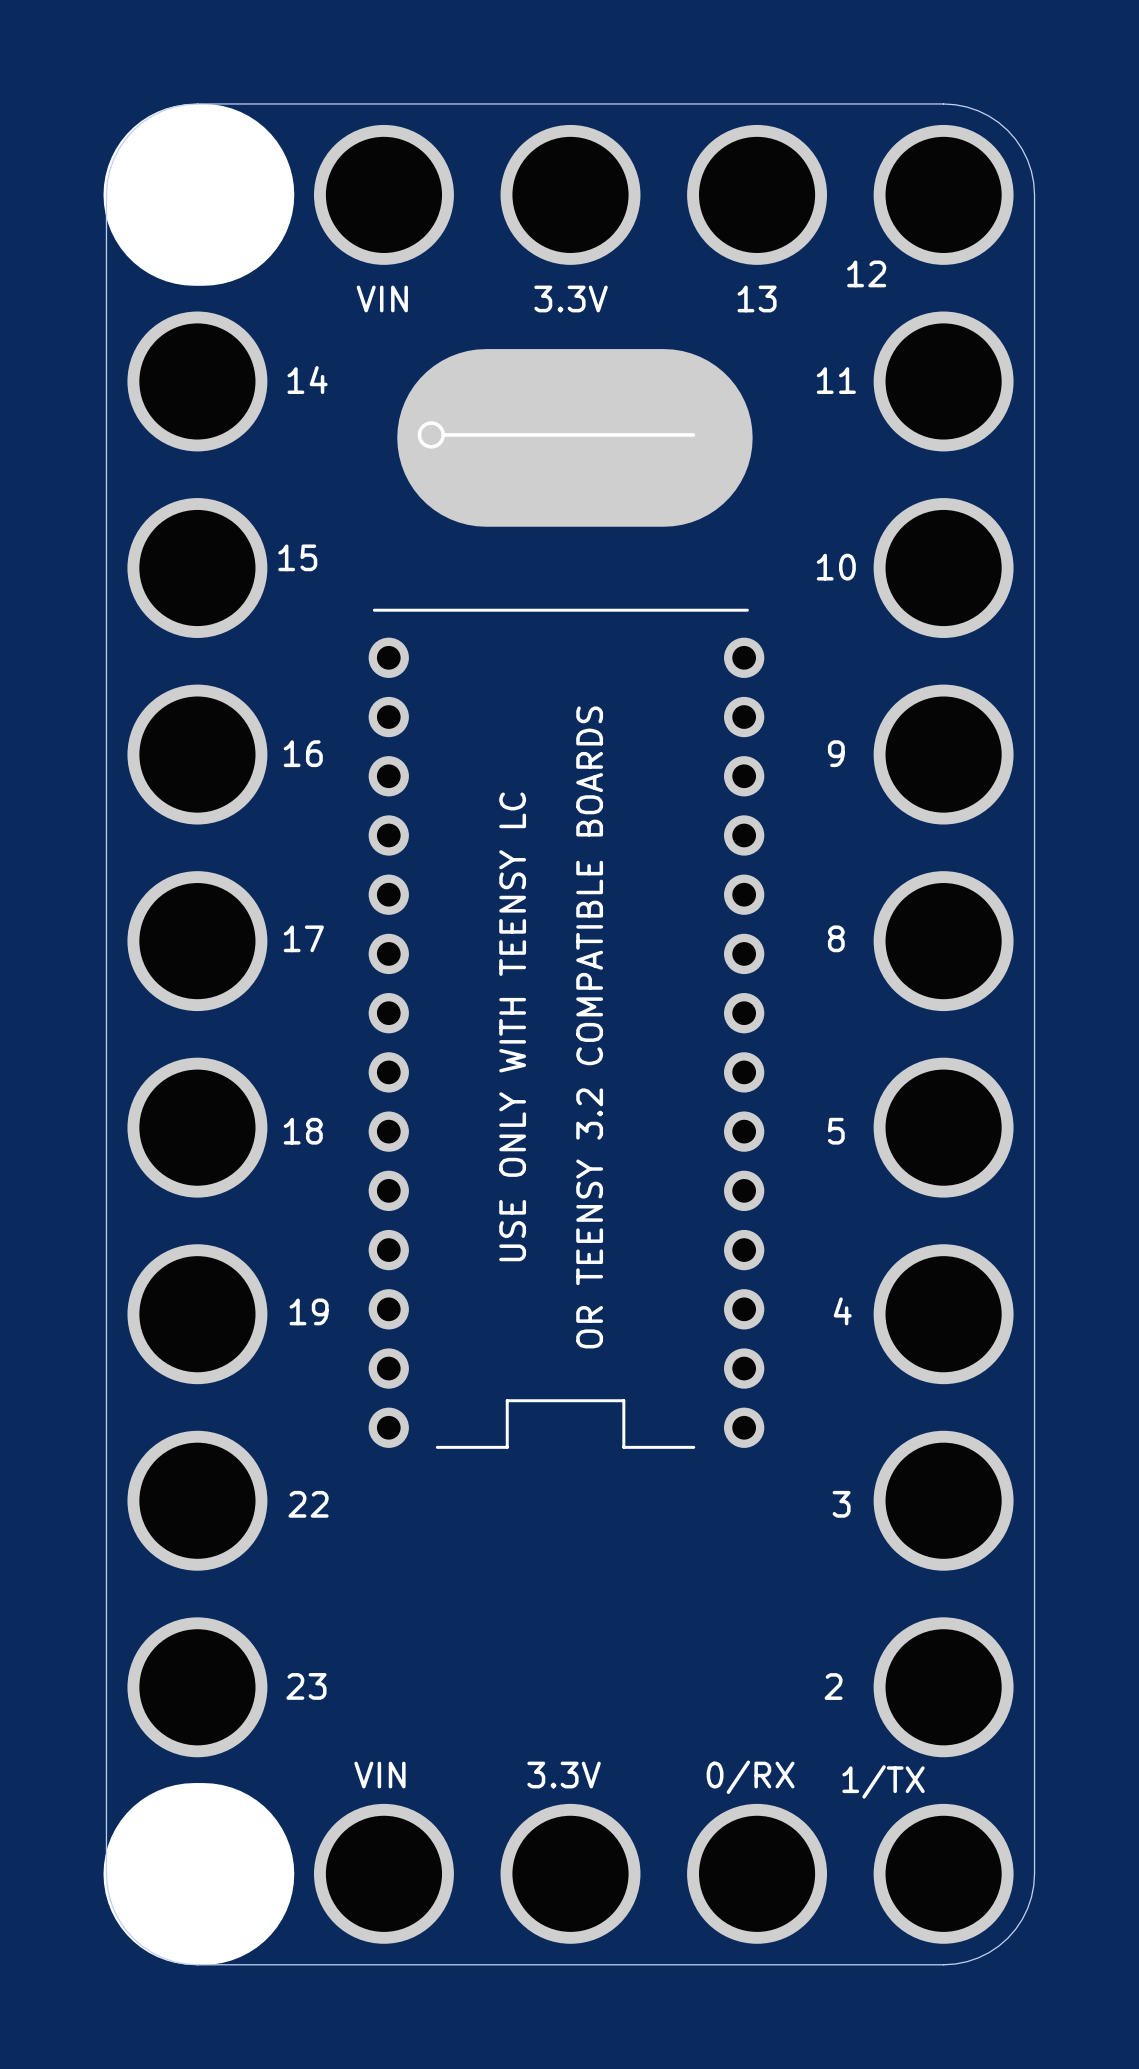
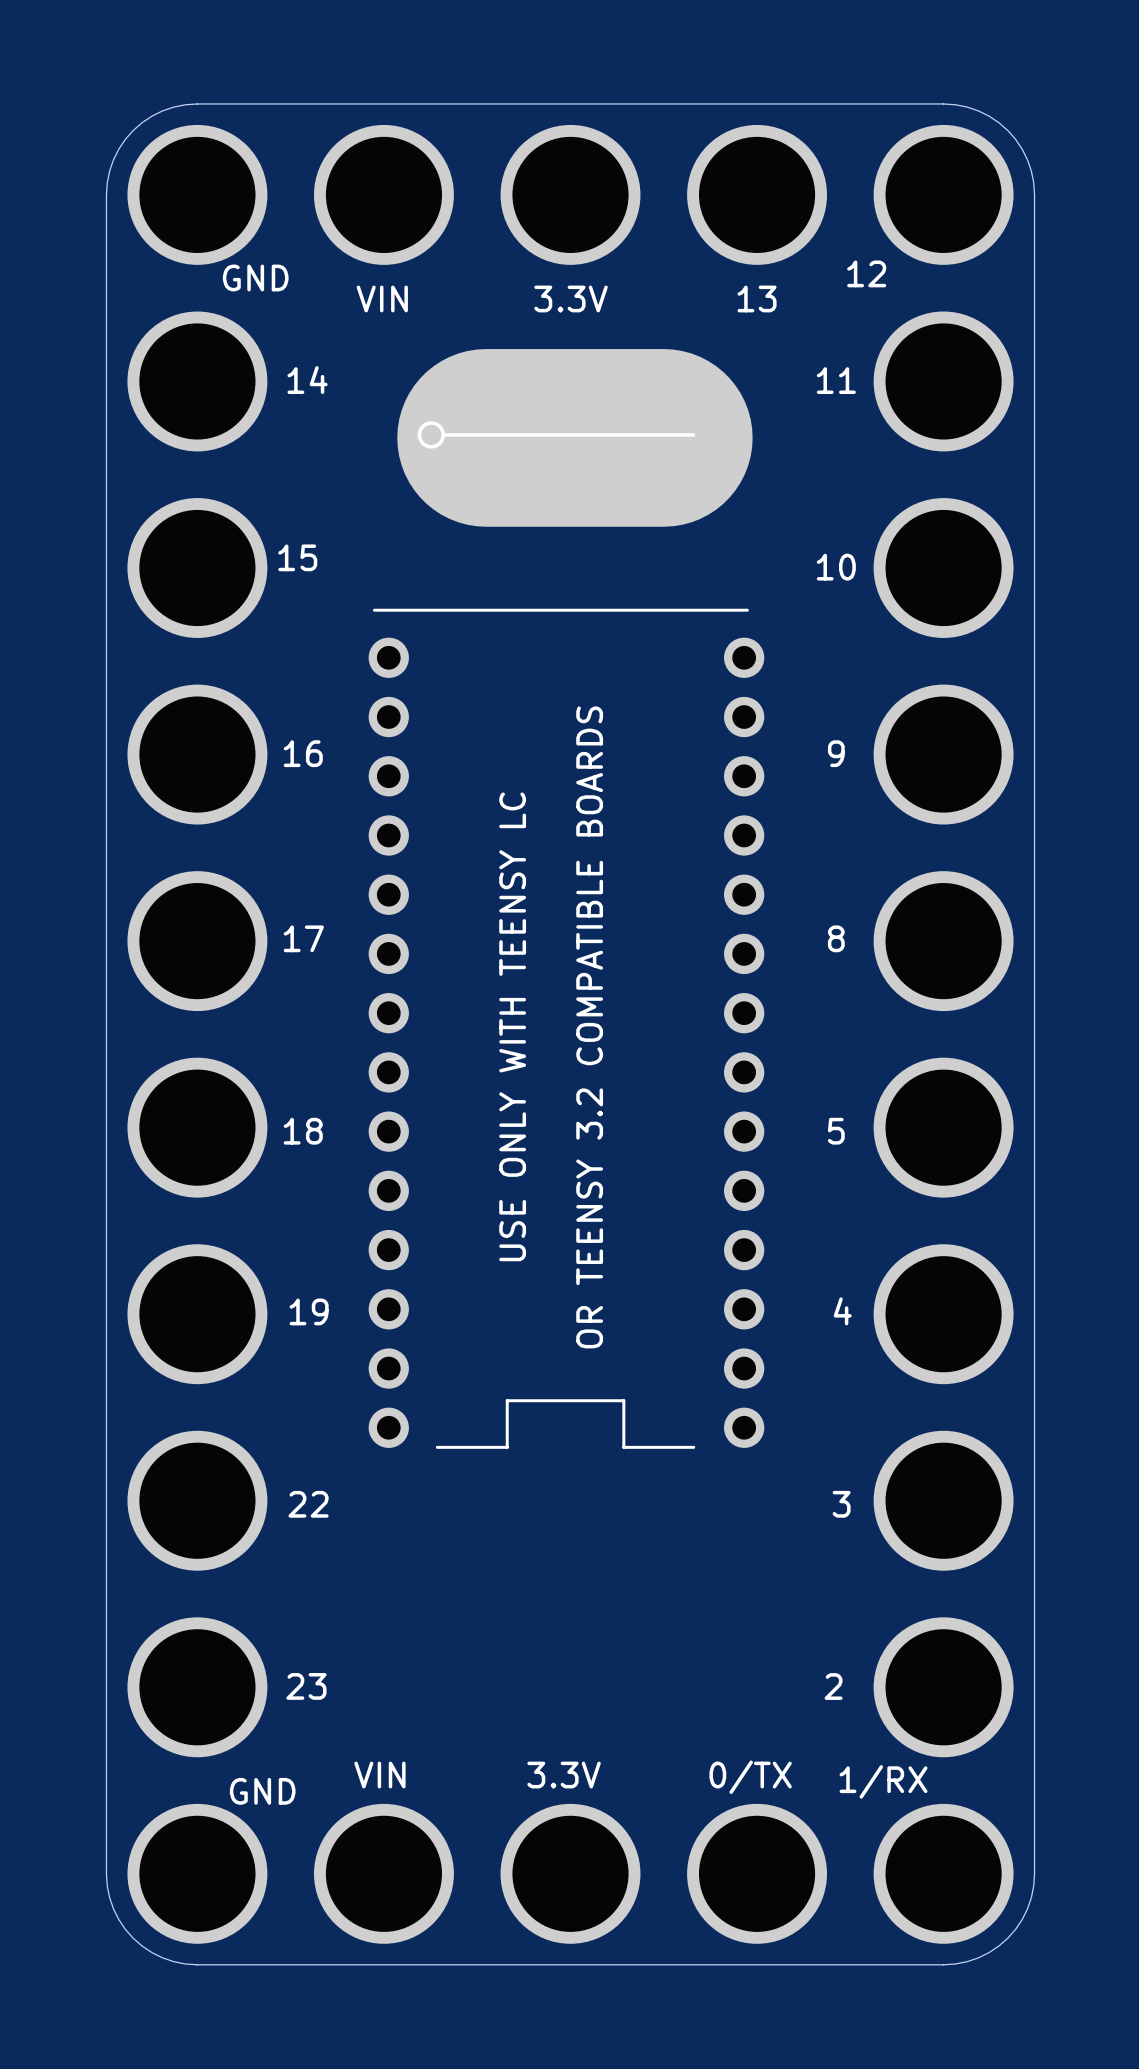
part footprint: [103, 103, 1036, 1966] -> [105, 103, 1036, 1966]

